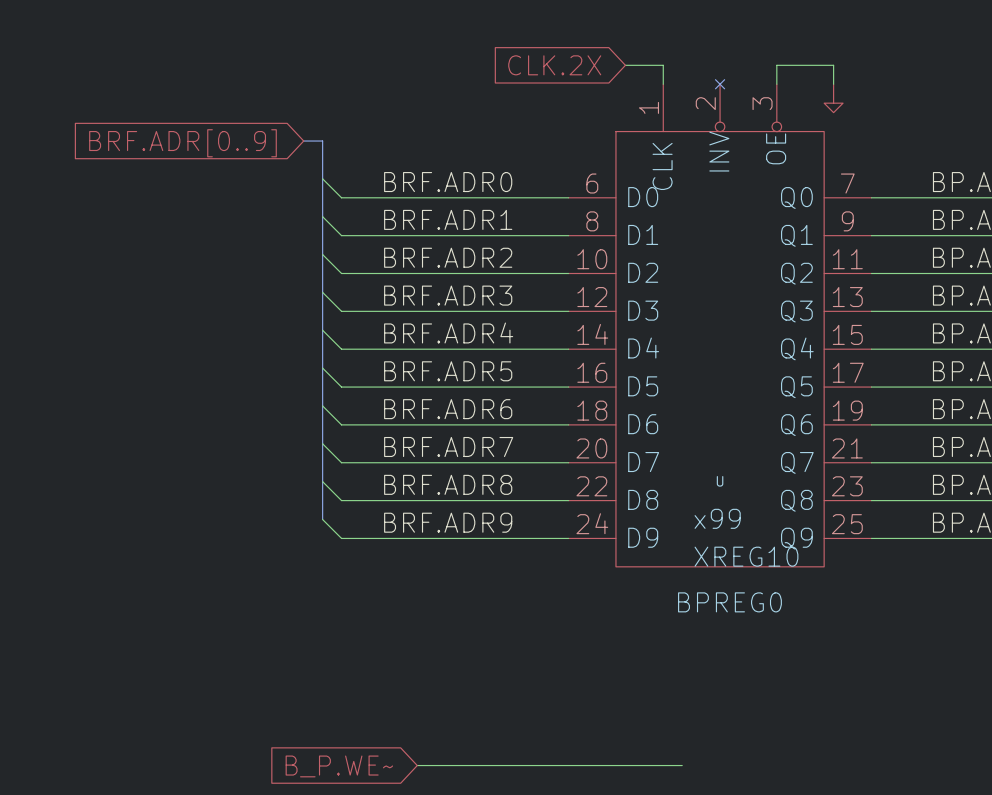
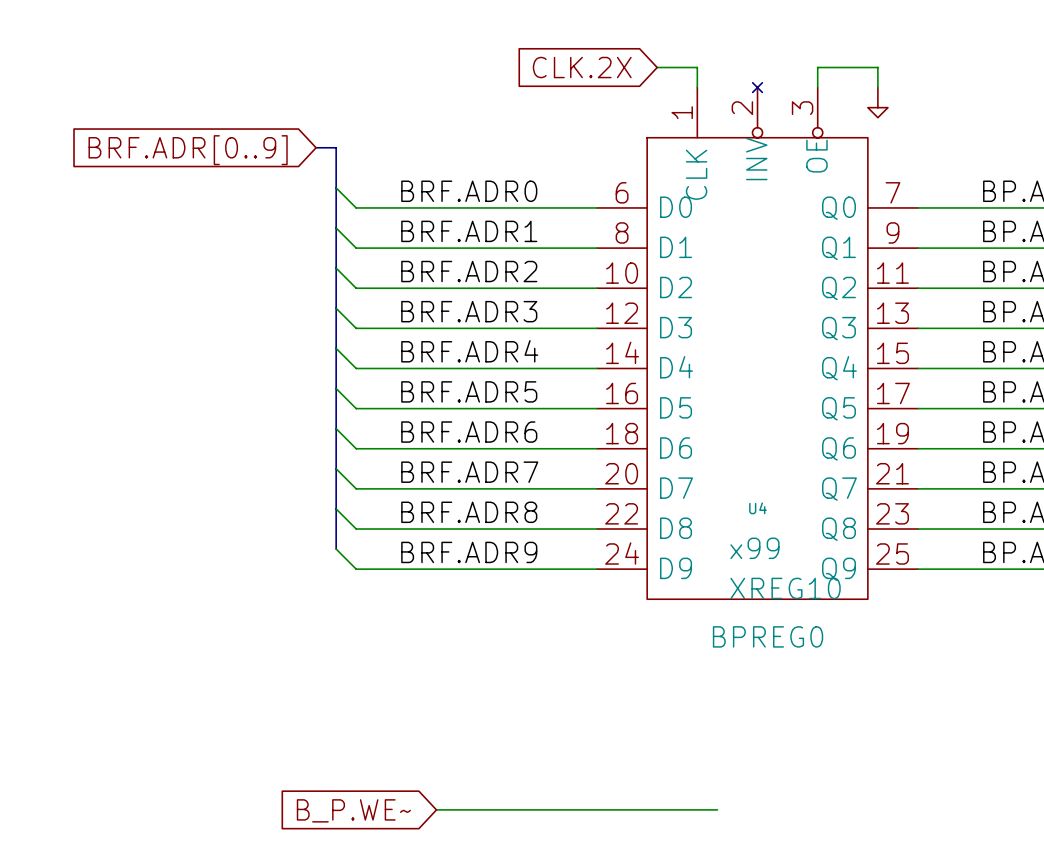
U name: U (720, 481) -> U4 (757, 508)

